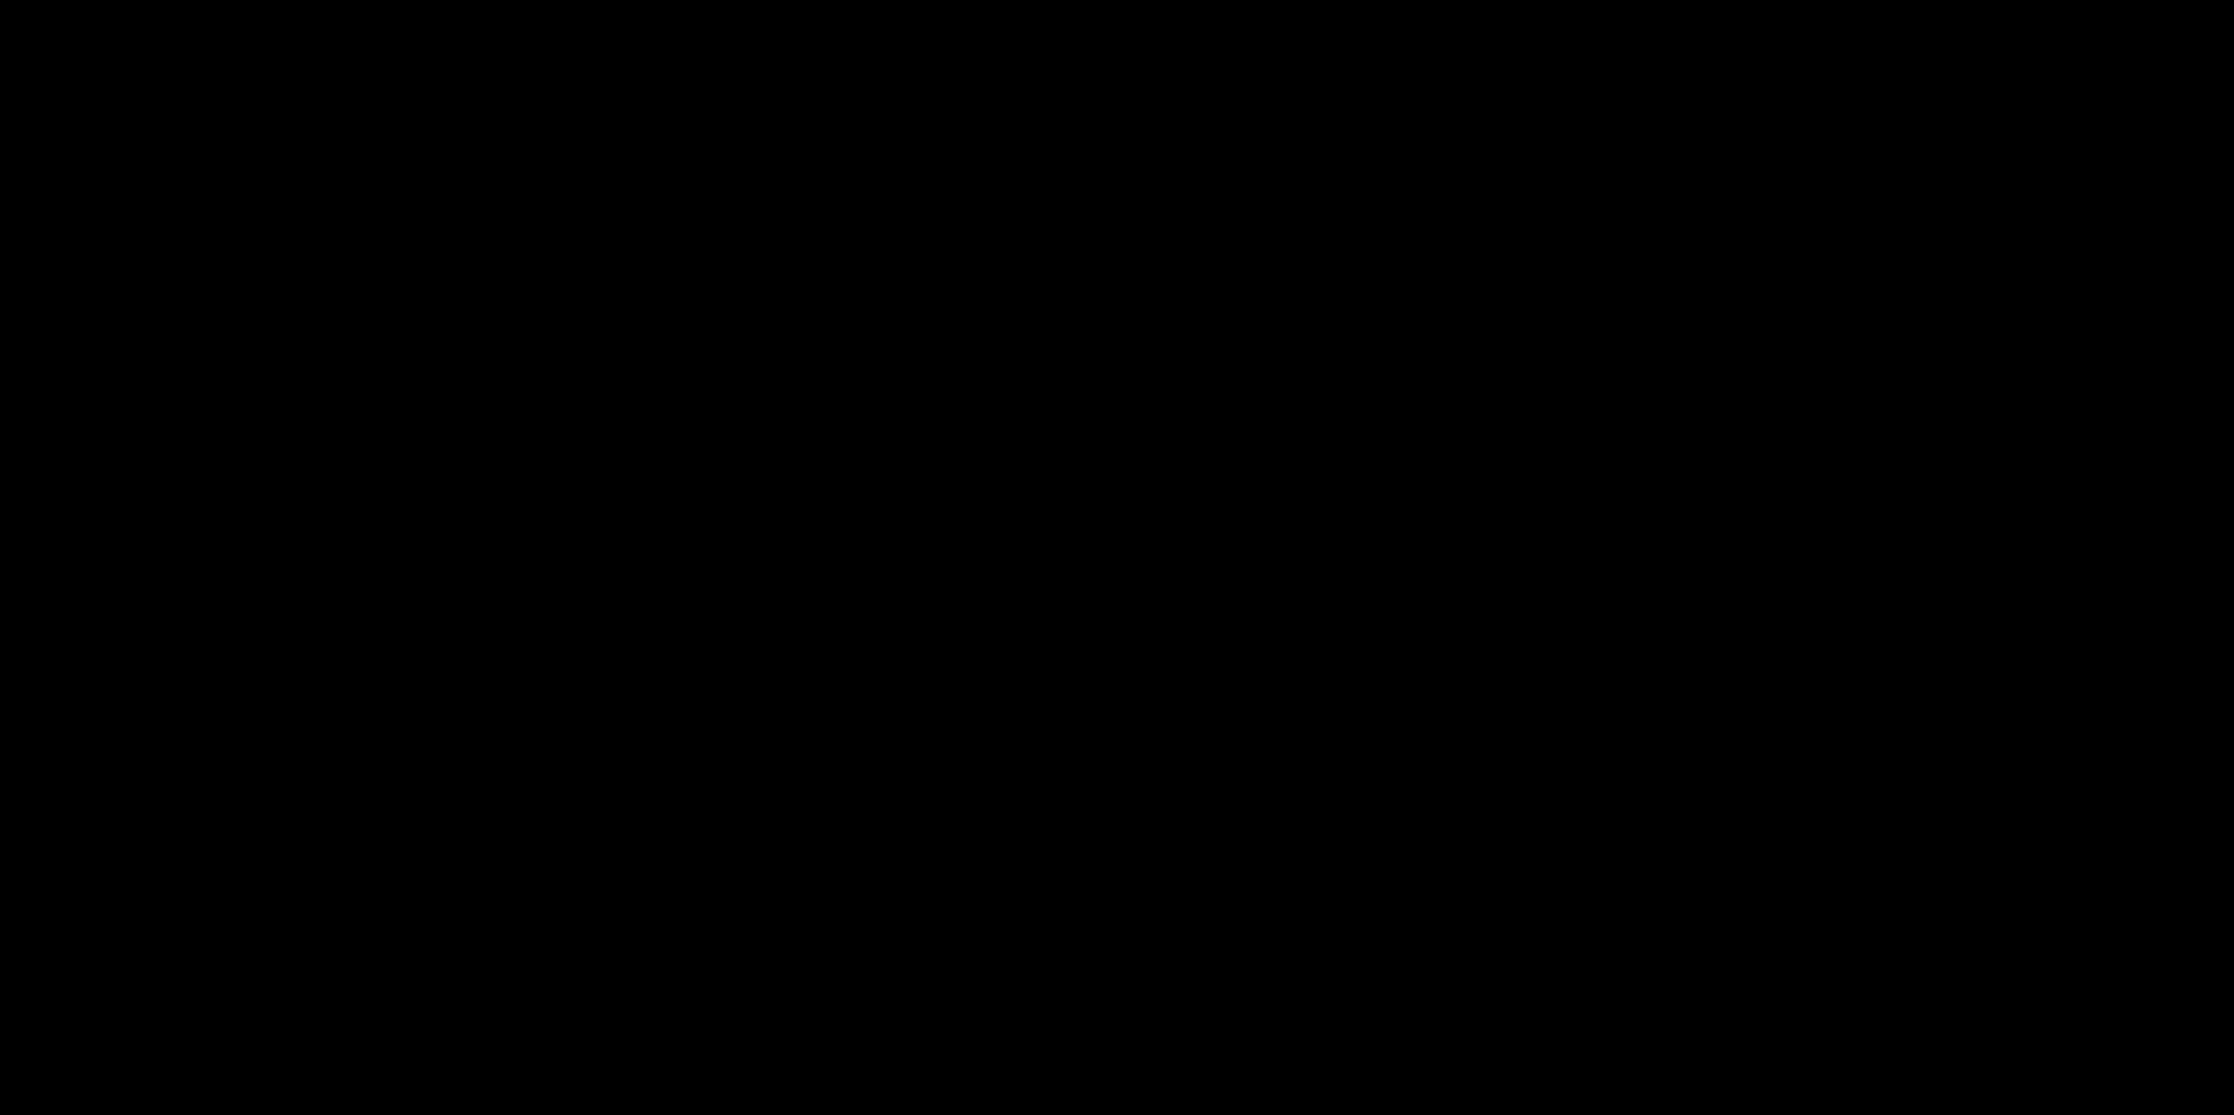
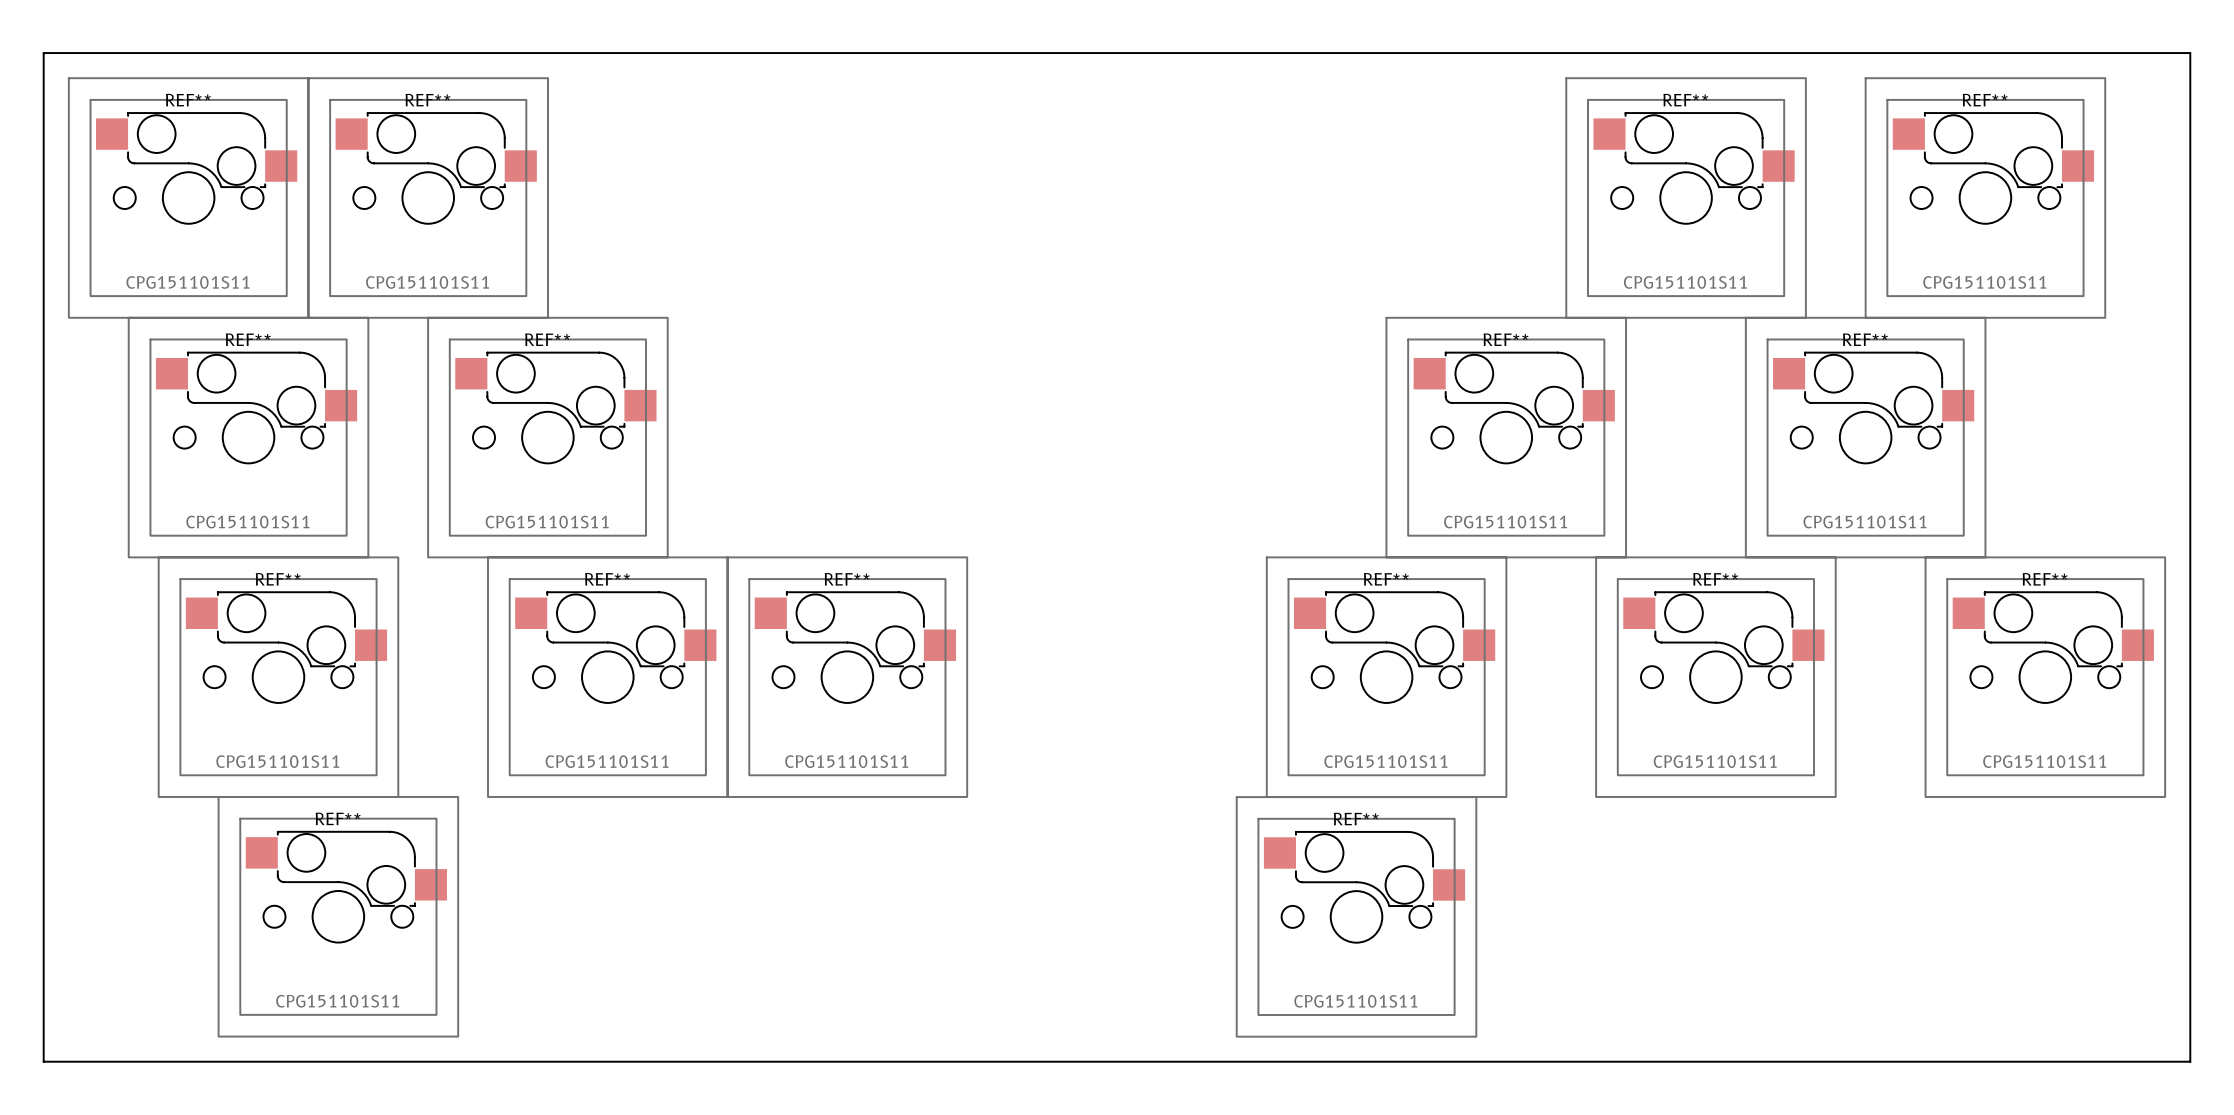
board edge: none -> (43, 53) (2190, 53) (2190, 1061) (43, 1061) (43, 53)
REF**: none -> CPG151101S11 (188, 197)
REF**: none -> CPG151101S11 (428, 197)
REF**: none -> CPG151101S11 (1686, 197)
REF**: none -> CPG151101S11 (1985, 197)
REF**: none -> CPG151101S11 (248, 437)
REF**: none -> CPG151101S11 (547, 437)
REF**: none -> CPG151101S11 (1506, 437)
REF**: none -> CPG151101S11 (1865, 437)
REF**: none -> CPG151101S11 (278, 677)
REF**: none -> CPG151101S11 (607, 677)
REF**: none -> CPG151101S11 (847, 677)
REF**: none -> CPG151101S11 (1386, 677)
REF**: none -> CPG151101S11 (1715, 677)
REF**: none -> CPG151101S11 (2045, 677)
REF**: none -> CPG151101S11 (338, 916)
REF**: none -> CPG151101S11 (1356, 916)

